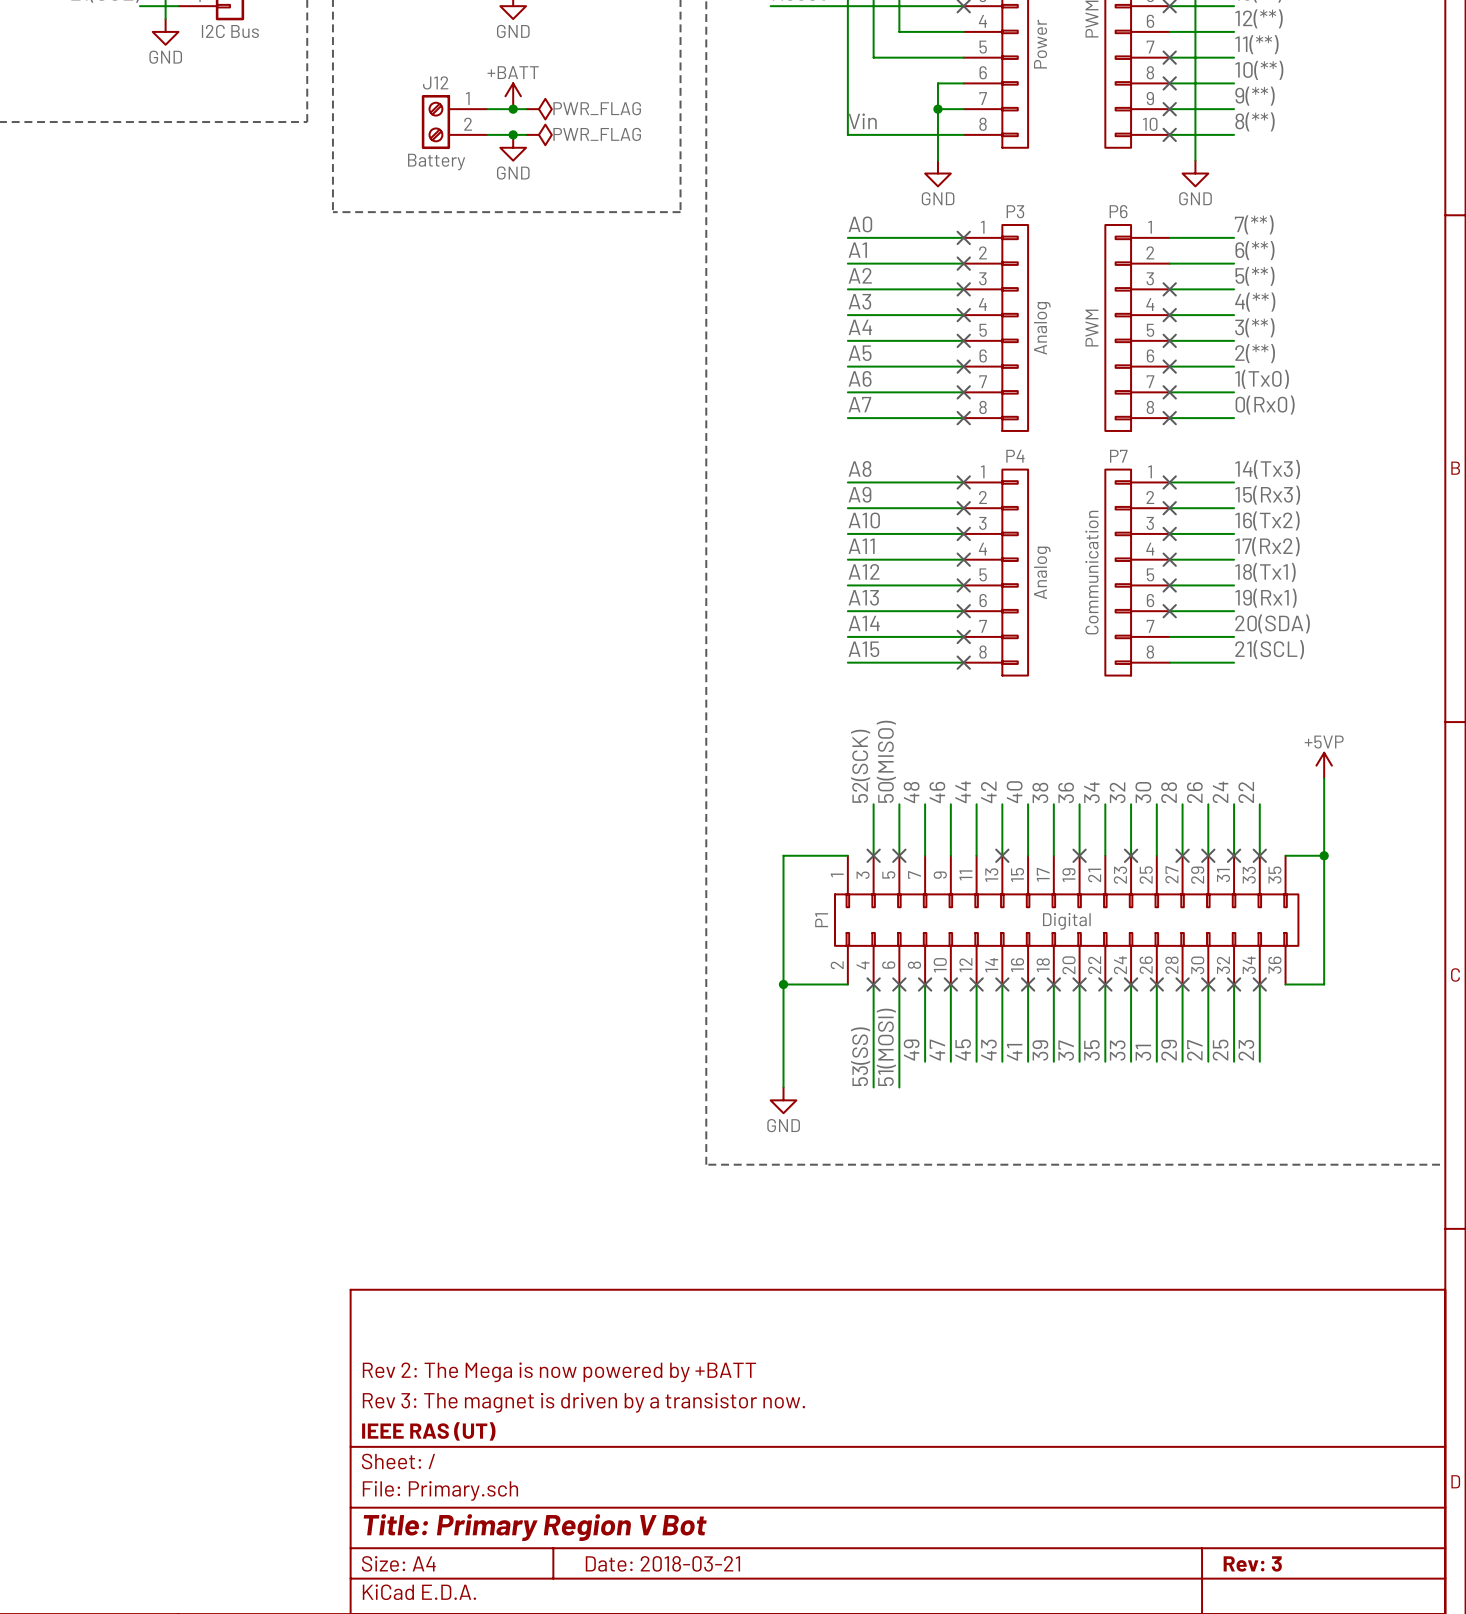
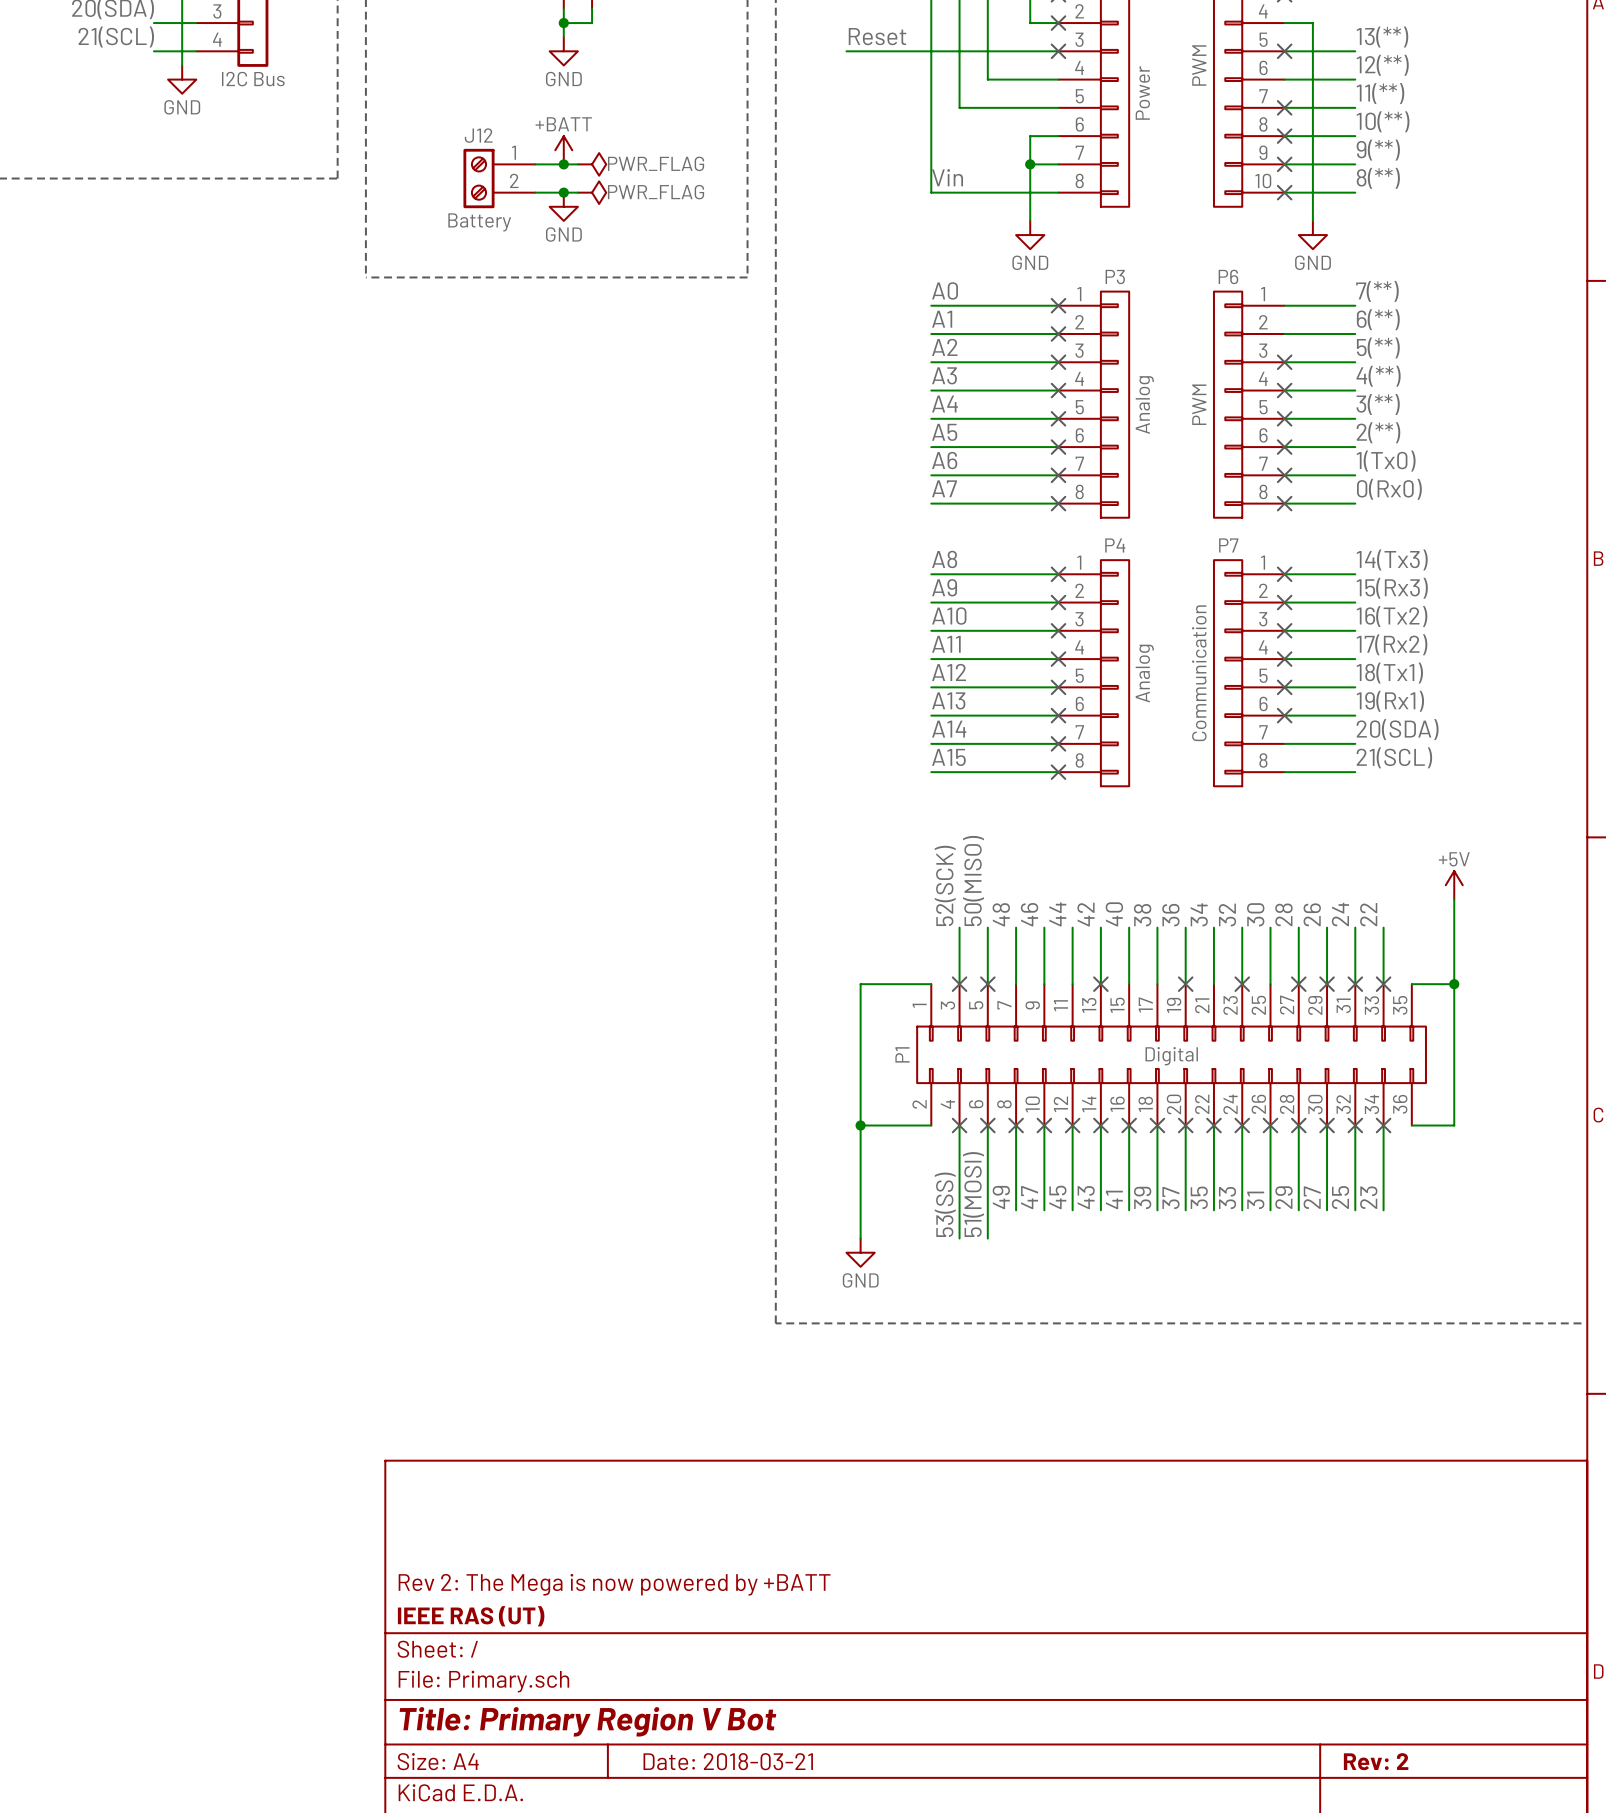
power symbol: +5VP (1324, 765) -> +5V (1454, 885)
title block: Rev 2: The Mega is now powered by +BATT (559, 1372) -> none
title block: Rev 3: The magnet is driven by a transistor now. (583, 1402) -> Rev 2: The Mega is now powered by +BATT (614, 1584)
title block: Rev: 3 (1252, 1563) -> Rev: 2 (1376, 1761)

